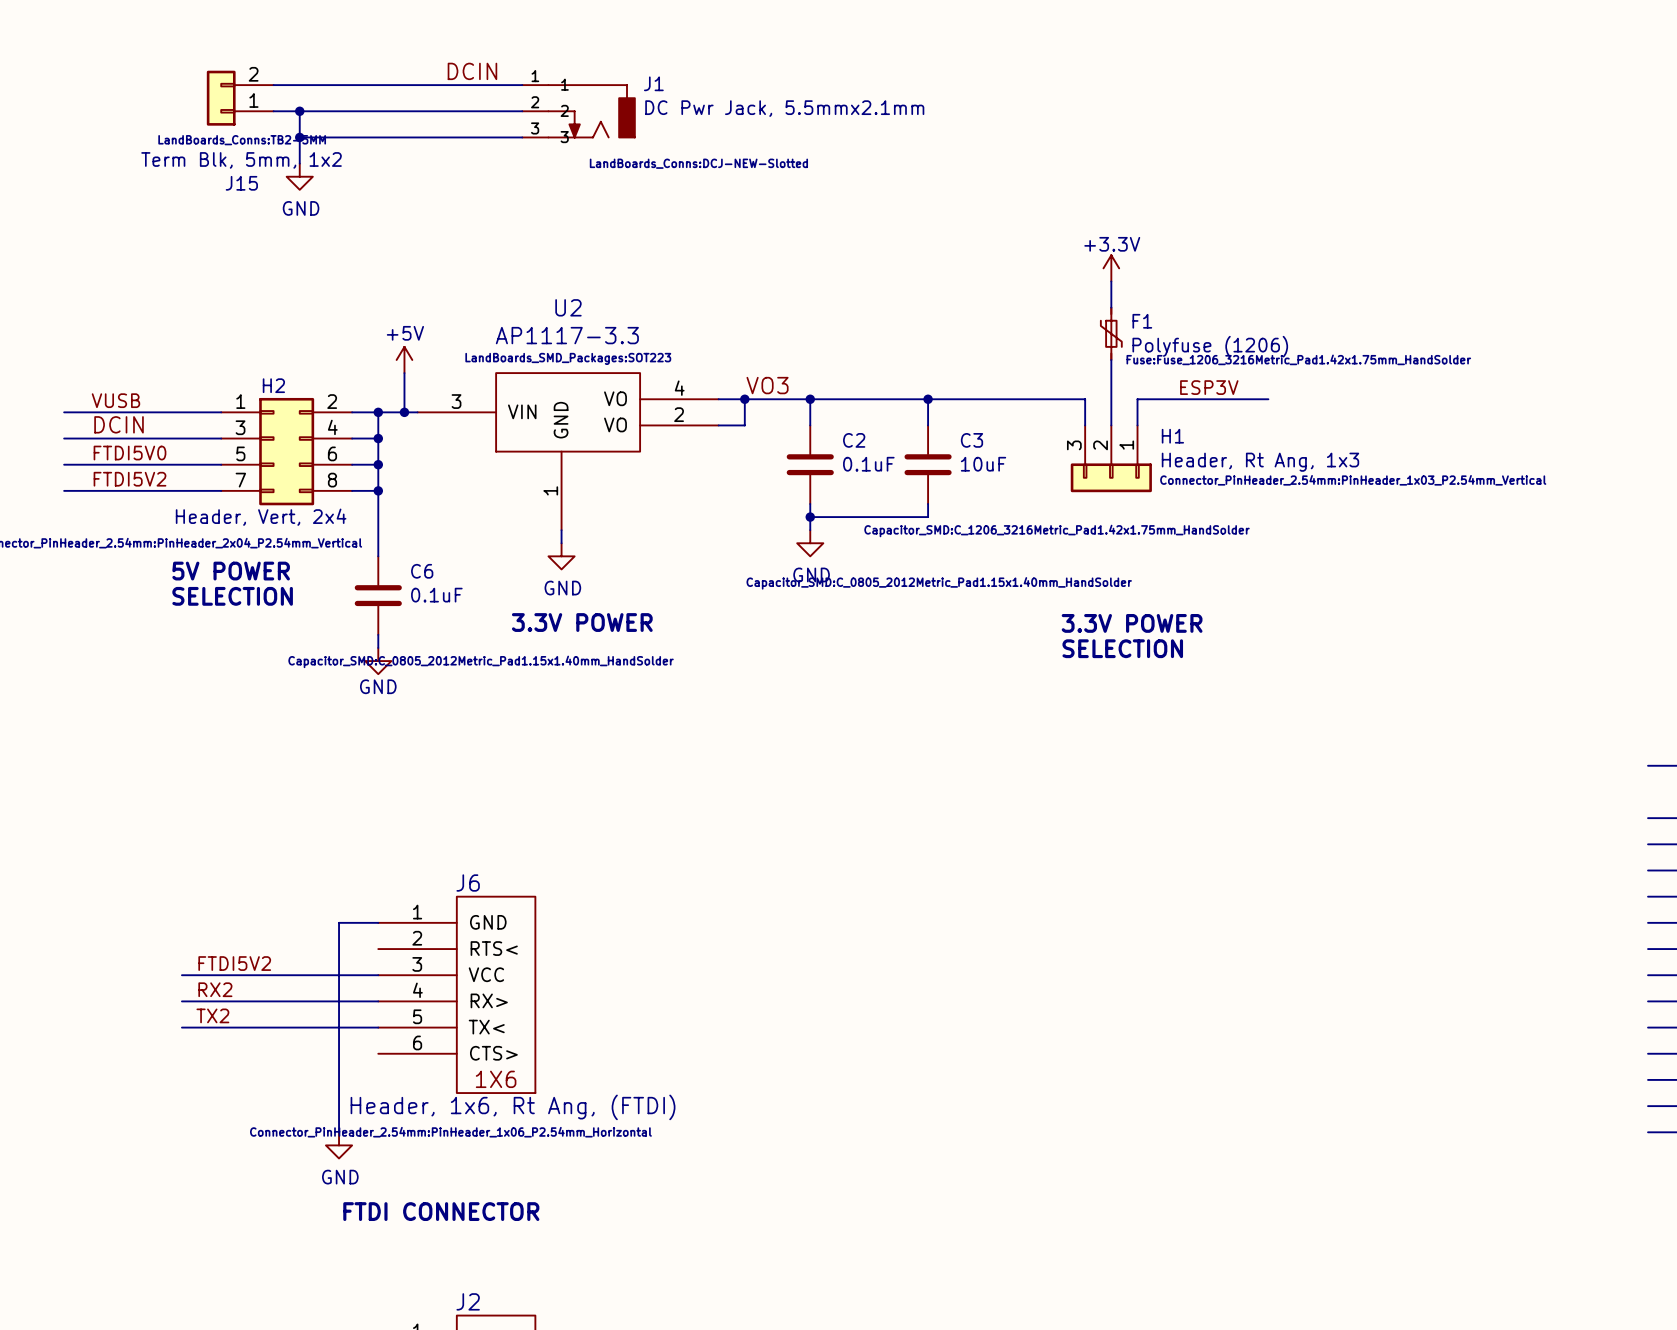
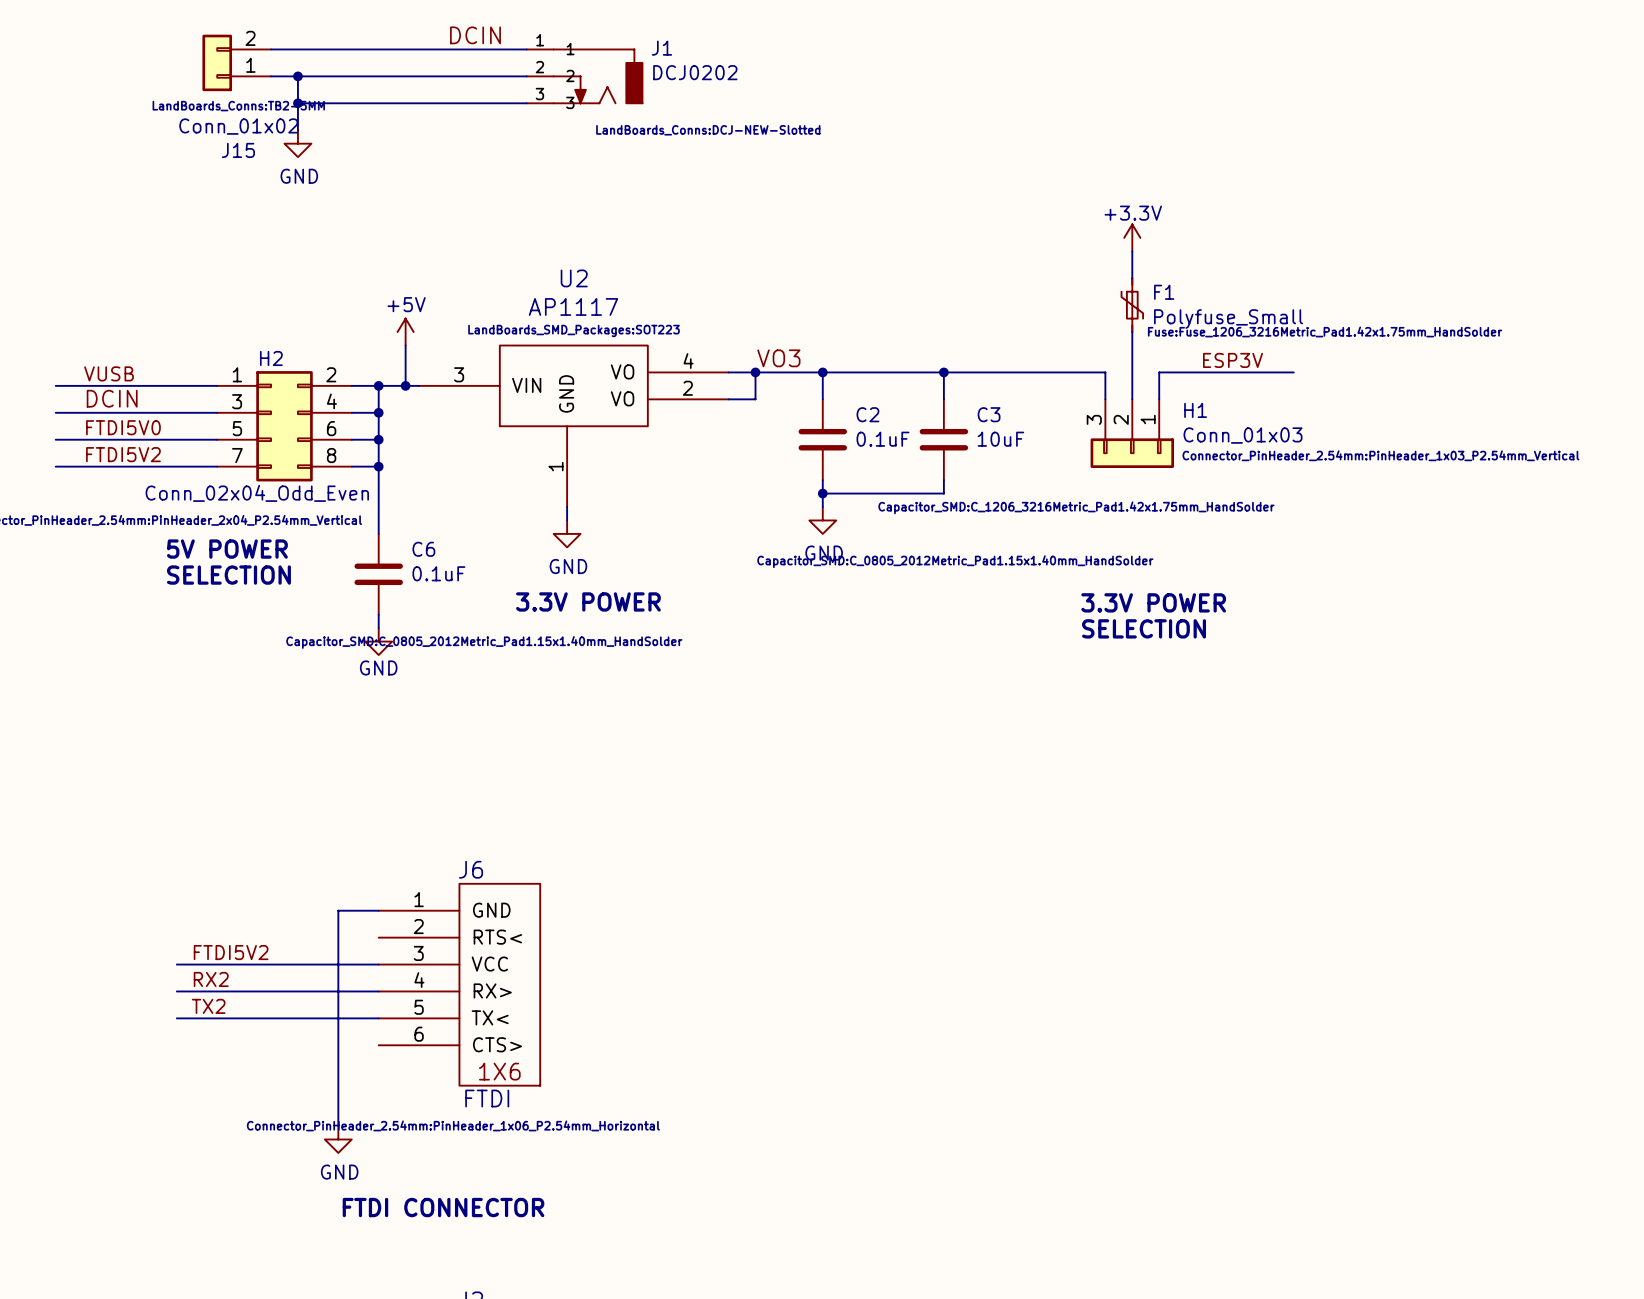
J1 value: DC Pwr Jack, 5.5mmx2.1mm (784, 108) -> DCJ0202 (695, 72)
J15 value: Term Blk, 5mm, 1x2 (241, 160) -> Conn_01x02 (238, 126)
U2 value: AP1117-3.3 (567, 335) -> AP1117 (573, 306)
F1 value: Polyfuse (1206) (1210, 346) -> Polyfuse_Small (1228, 319)
H1 value: Header, Rt Ang, 1x3 (1260, 462) -> Conn_01x03 (1243, 435)
H2 value: Header, Vert, 2x4 (261, 517) -> Conn_02x04_Odd_Even (257, 493)
J6 value: Header, 1x6, Rt Ang, (FTDI) (513, 1107) -> FTDI (487, 1098)

